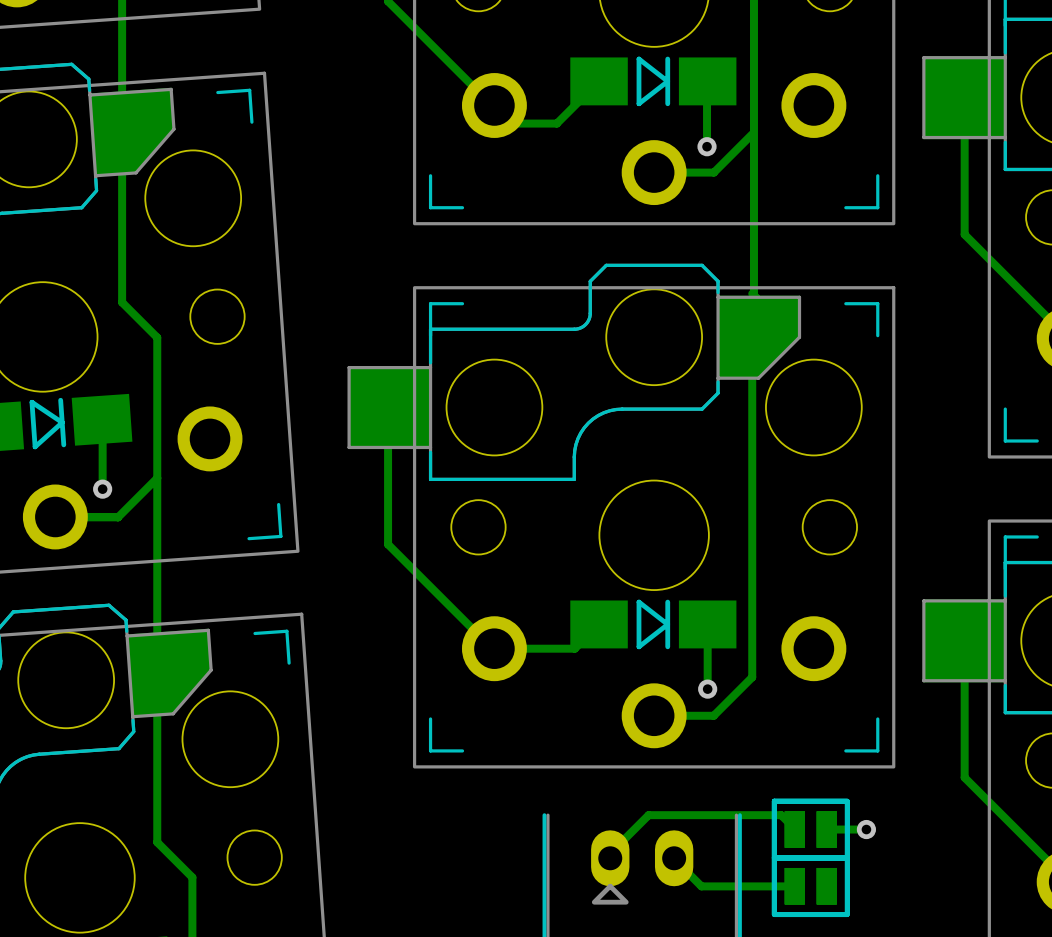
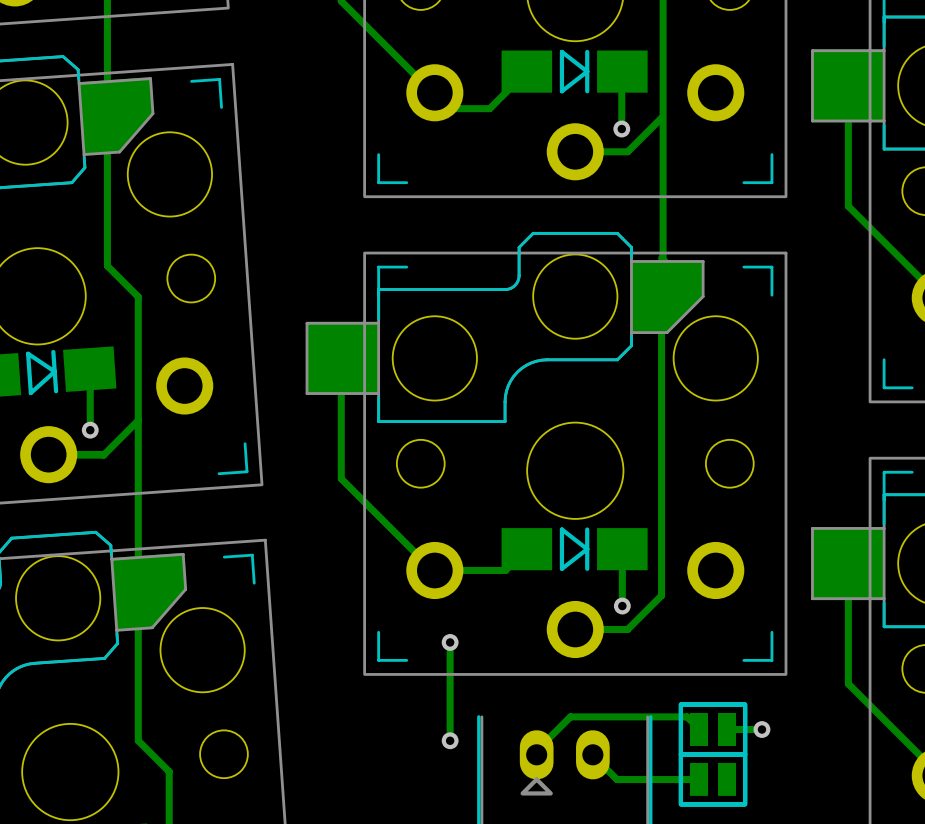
track: none -> (450, 642) (450, 740)
via: none -> (450, 642)
via: none -> (450, 740)

